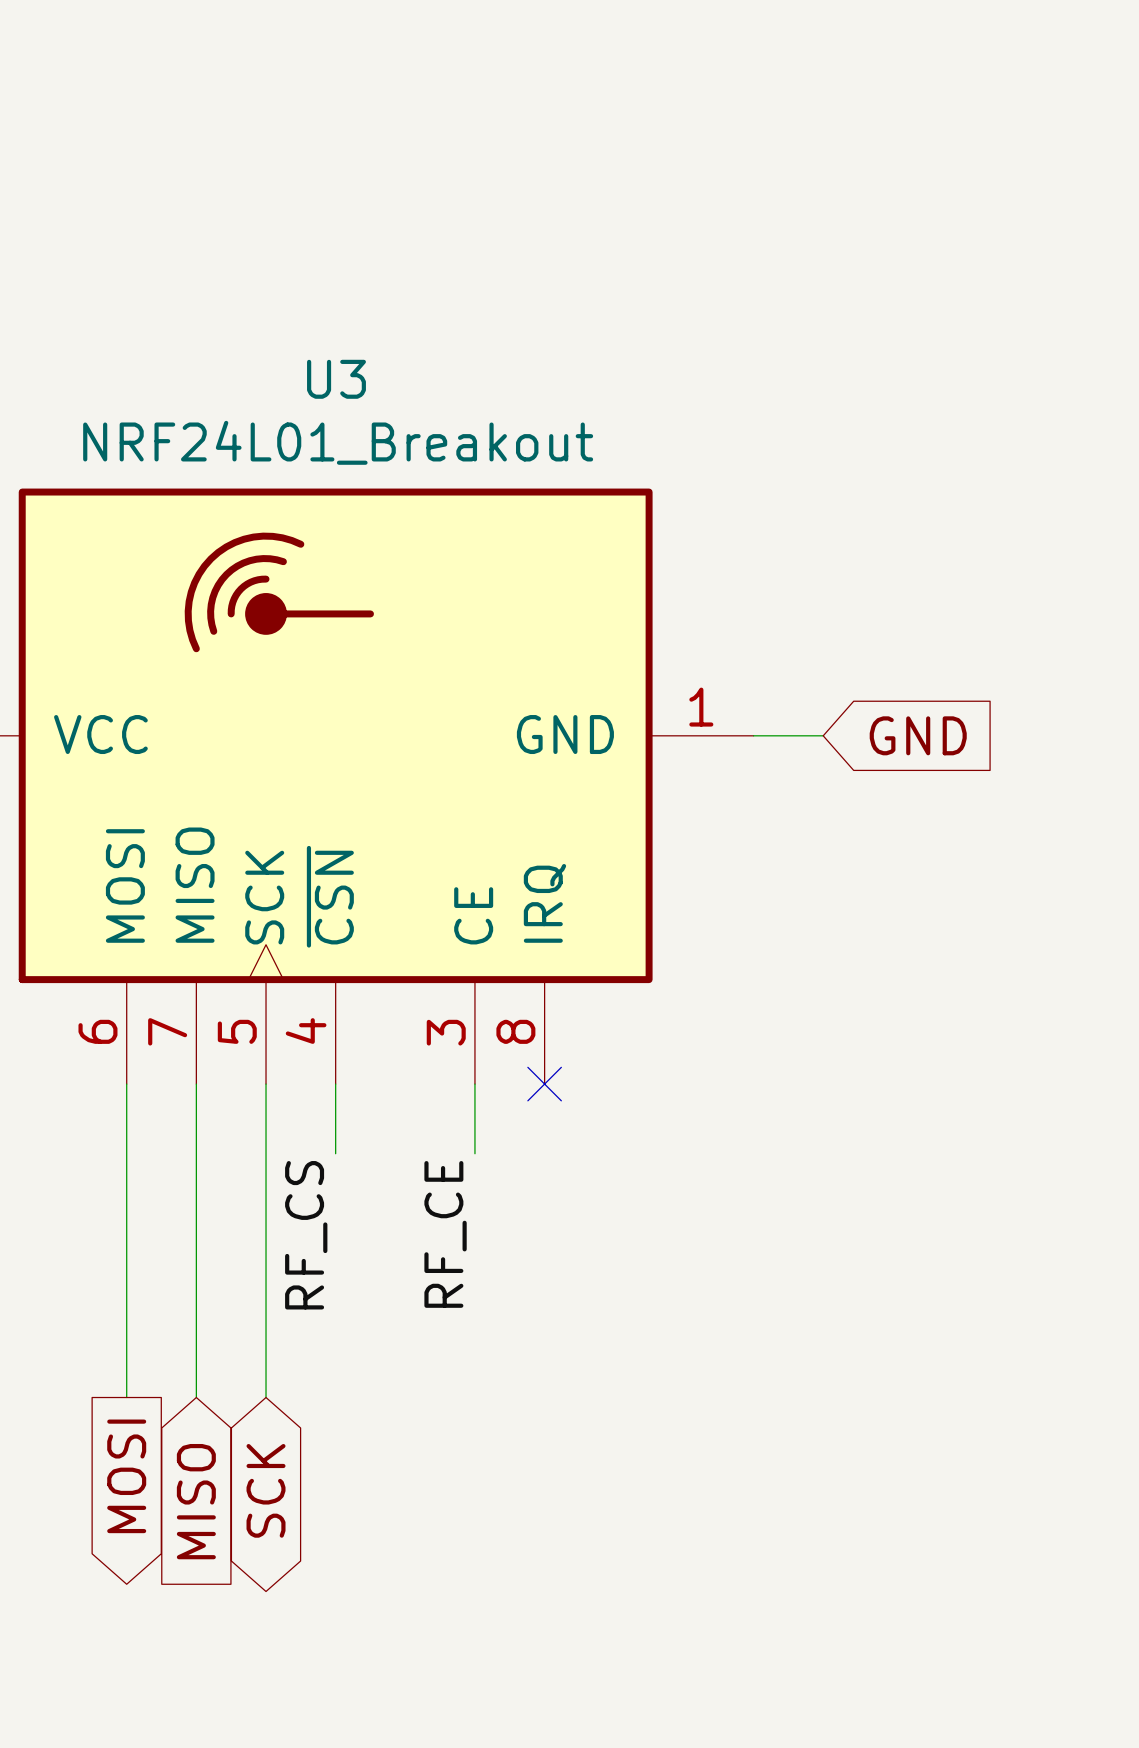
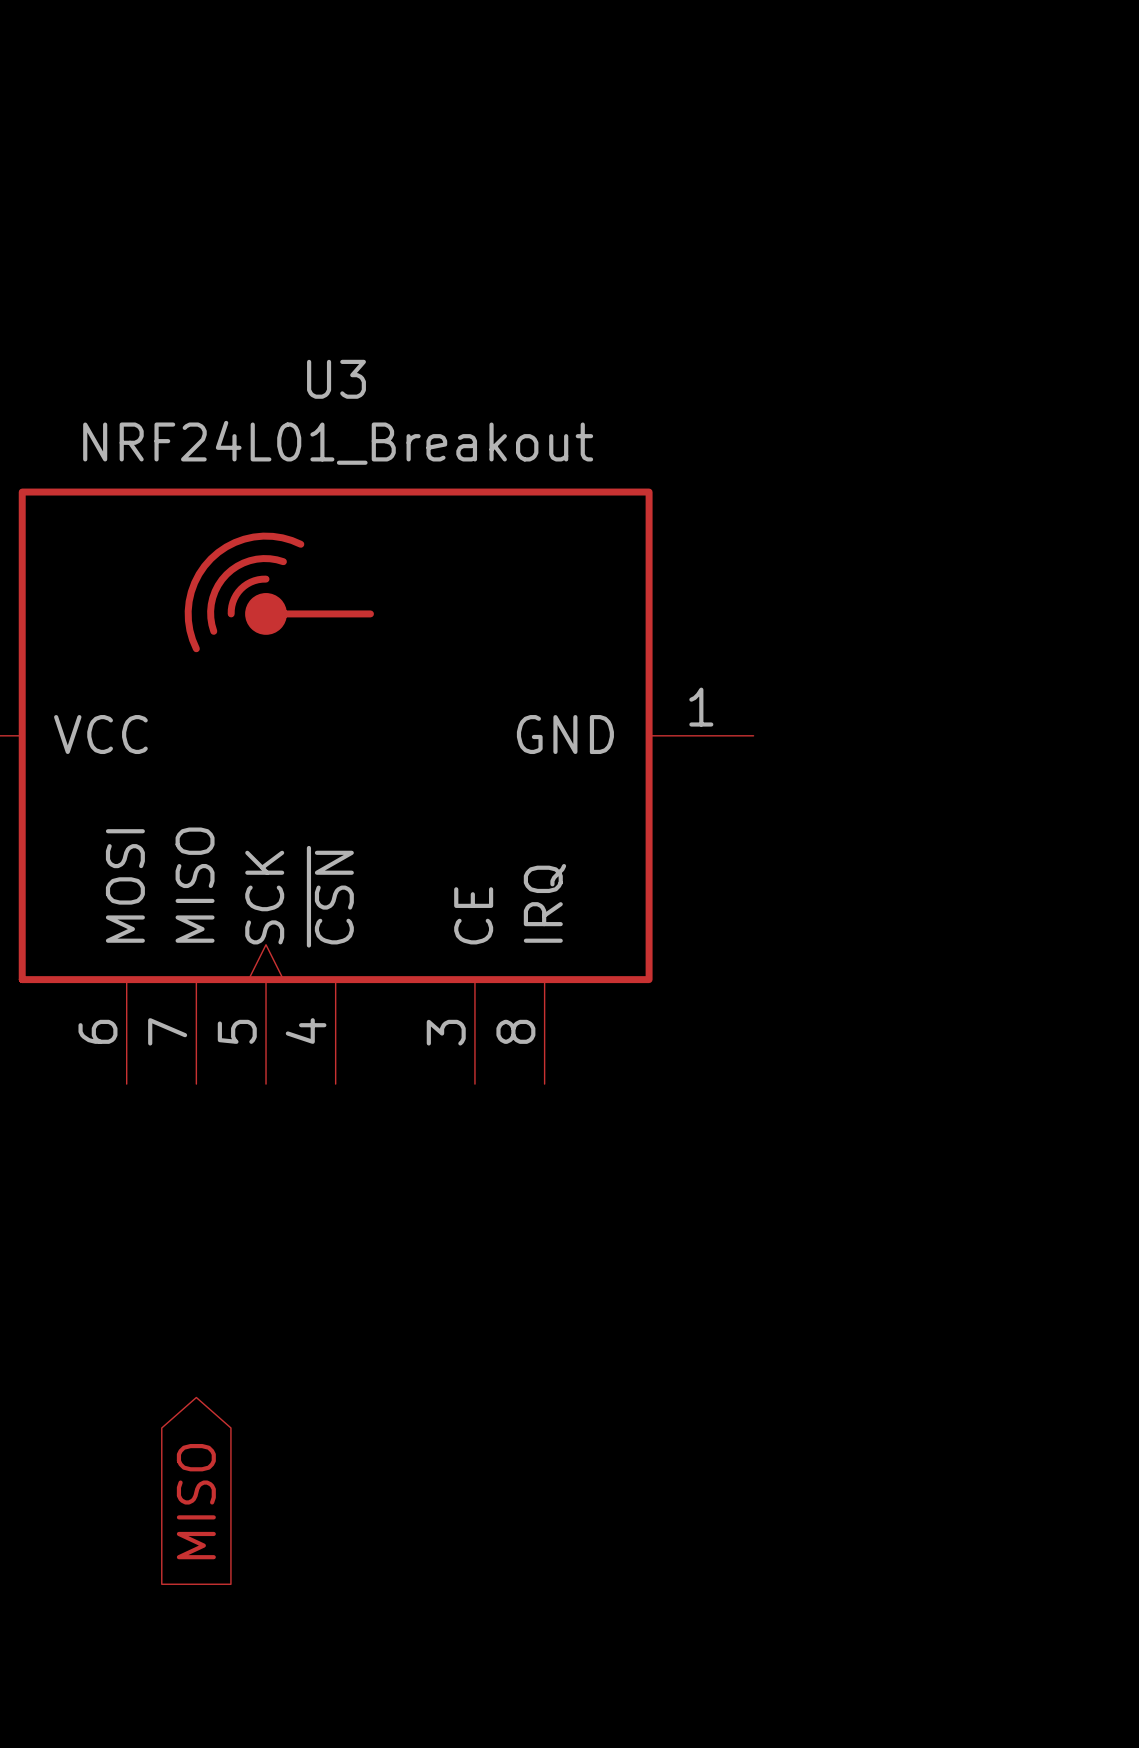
wire: (753, 735) (823, 735) -> none
global label: GND (918, 735) -> none
wire: (126, 1084) (126, 1397) -> none
wire: (196, 1084) (196, 1397) -> none
wire: (266, 1084) (266, 1397) -> none
wire: (335, 1084) (335, 1153) -> none
wire: (474, 1084) (474, 1153) -> none
no-connect mark: (544, 1084) -> none
label: RF_CE (445, 1234) -> none
label: RF_CS (306, 1235) -> none
global label: MOSI (126, 1476) -> none
global label: SCK (266, 1490) -> none

